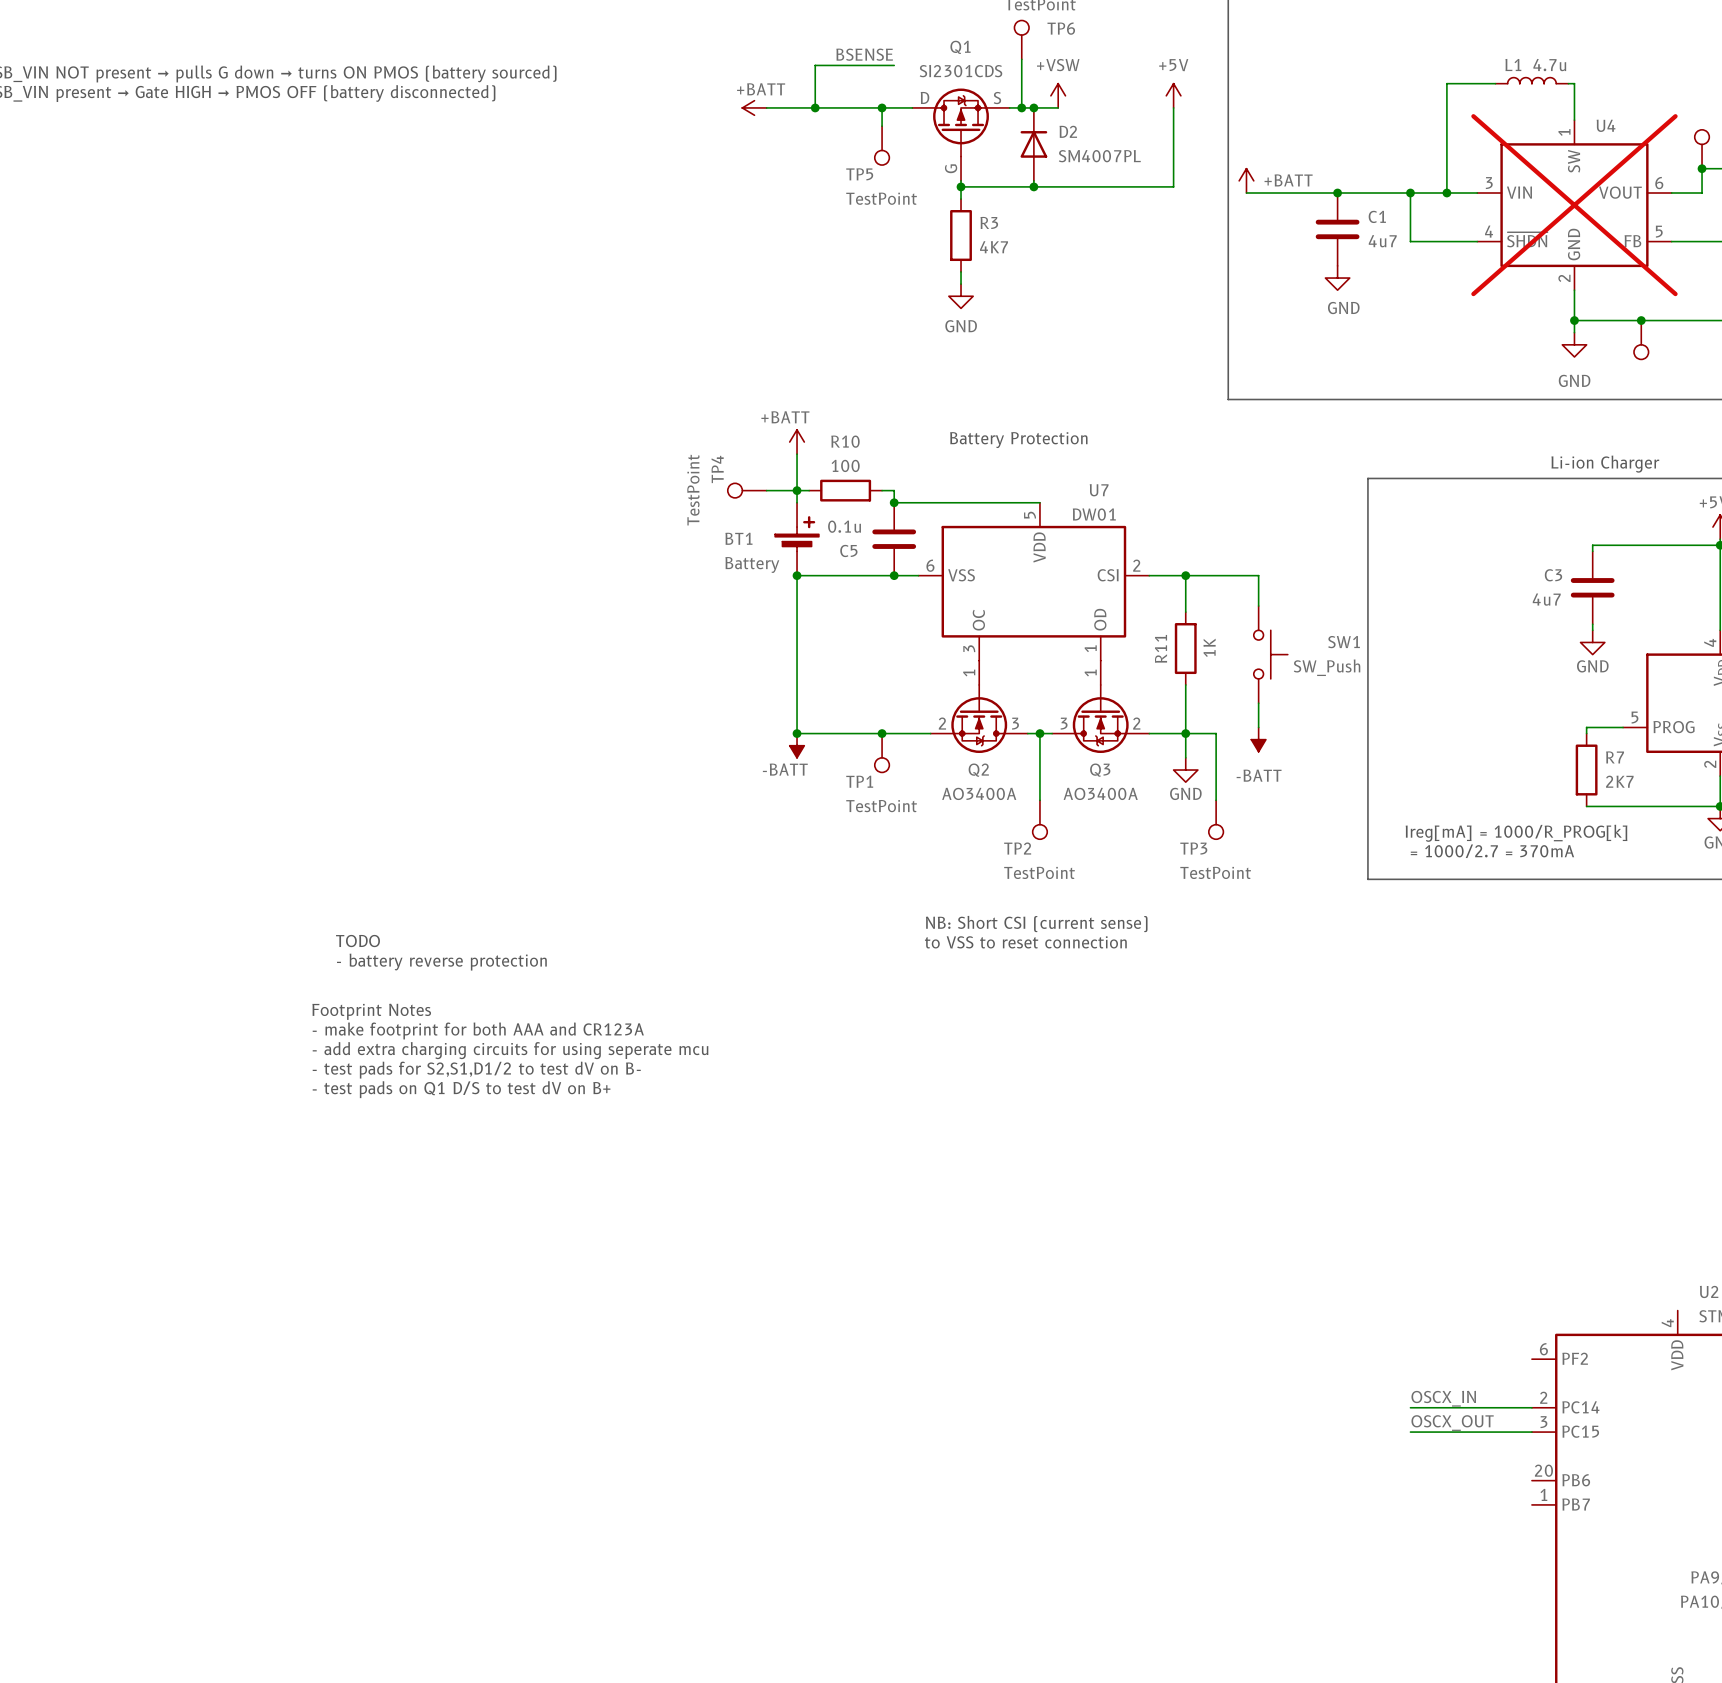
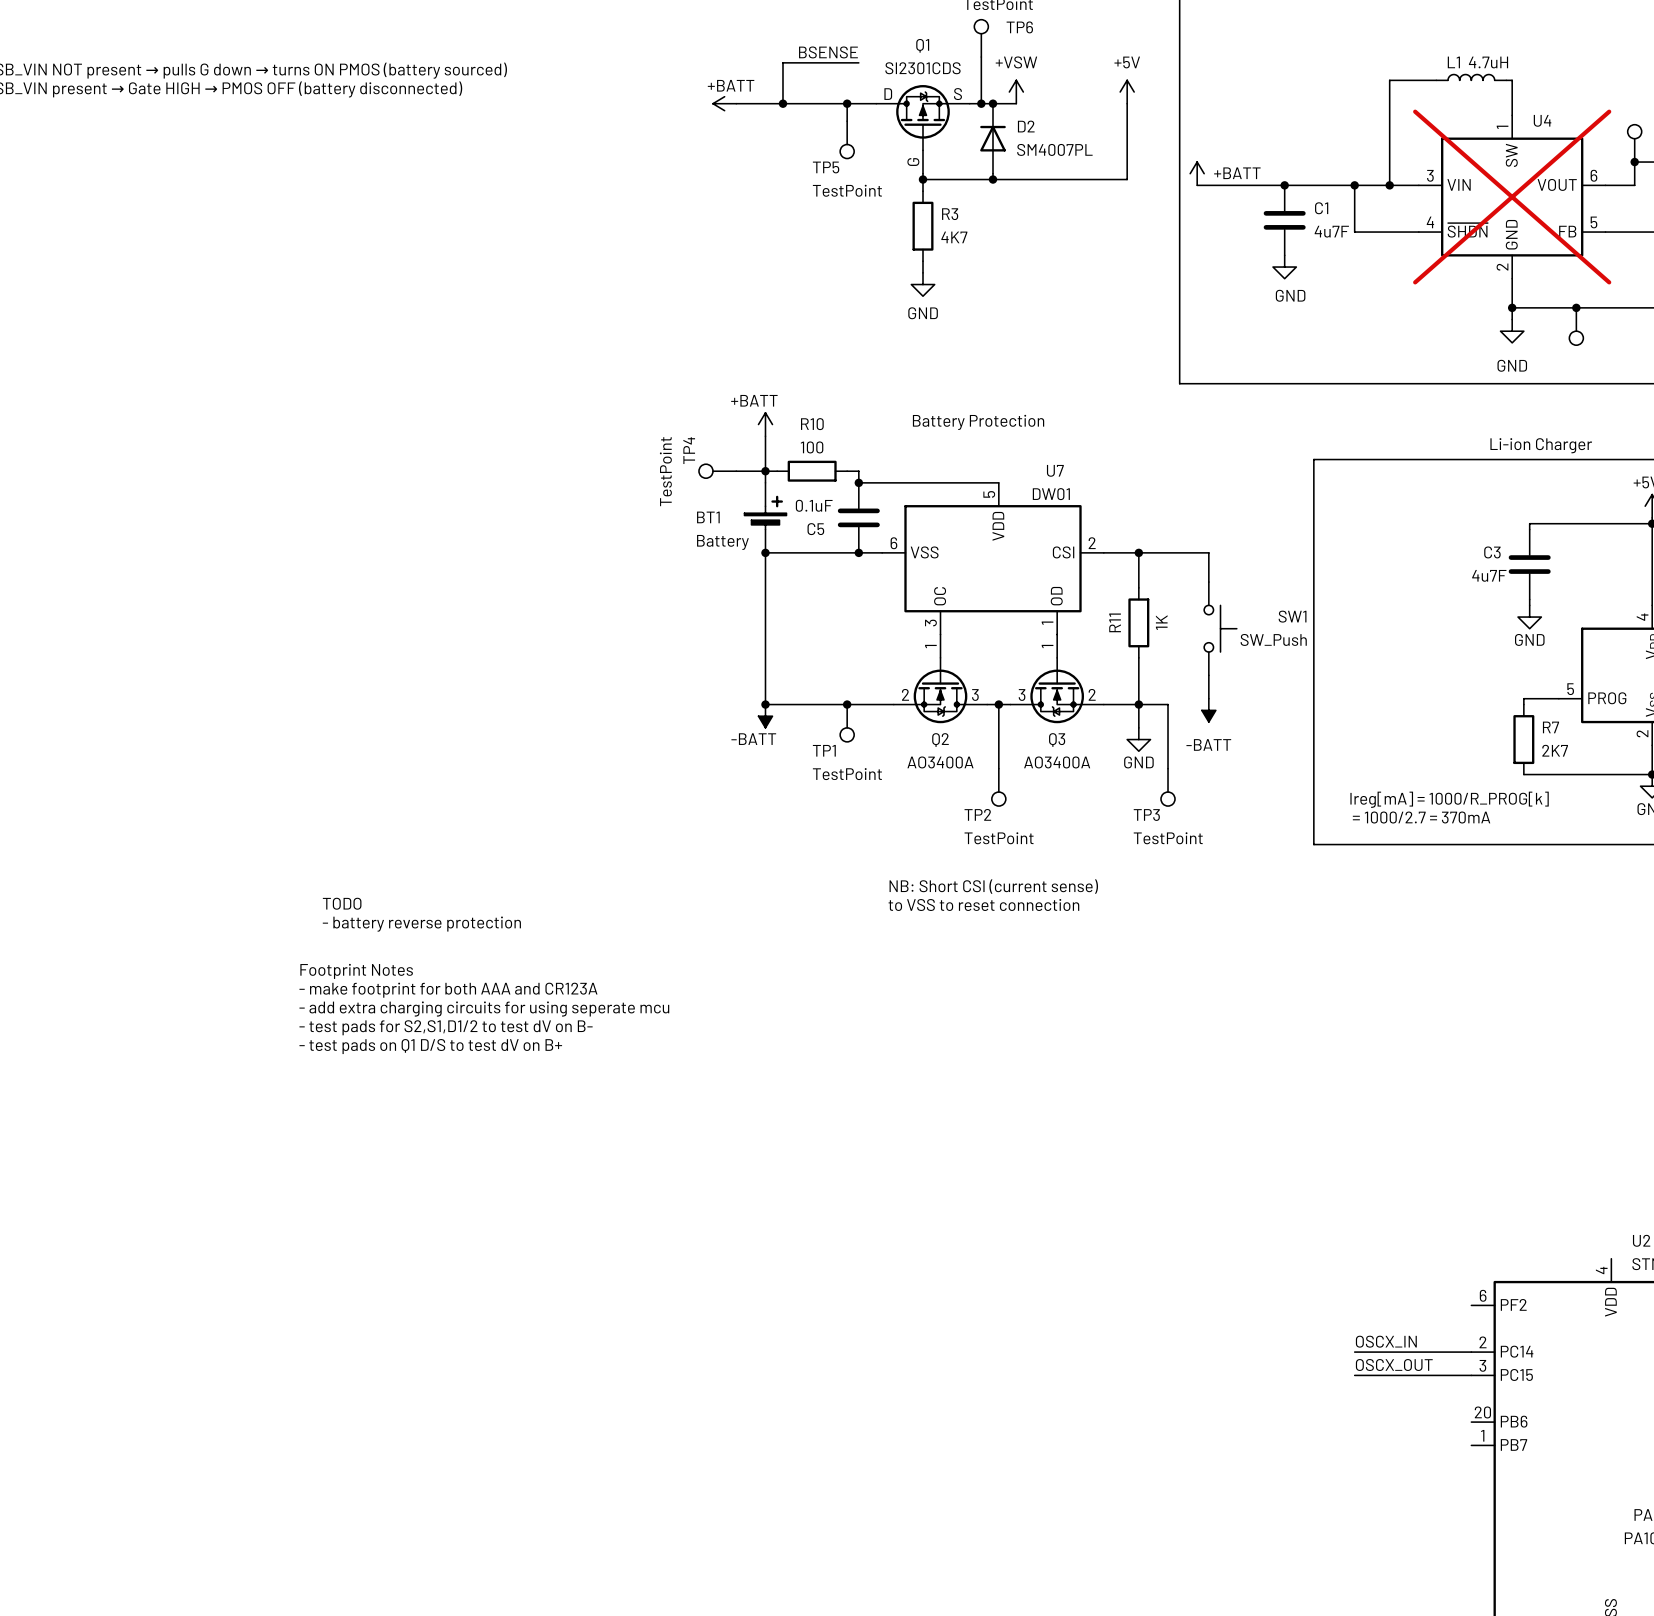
L1 value: 4.7u (1549, 65) -> 4.7uH (1488, 62)
C1 value: 4u7 (1382, 241) -> 4u7F (1331, 231)
C5 value: 0.1u (844, 526) -> 0.1uF (814, 505)
C3 value: 4u7 (1546, 599) -> 4u7F (1489, 575)

